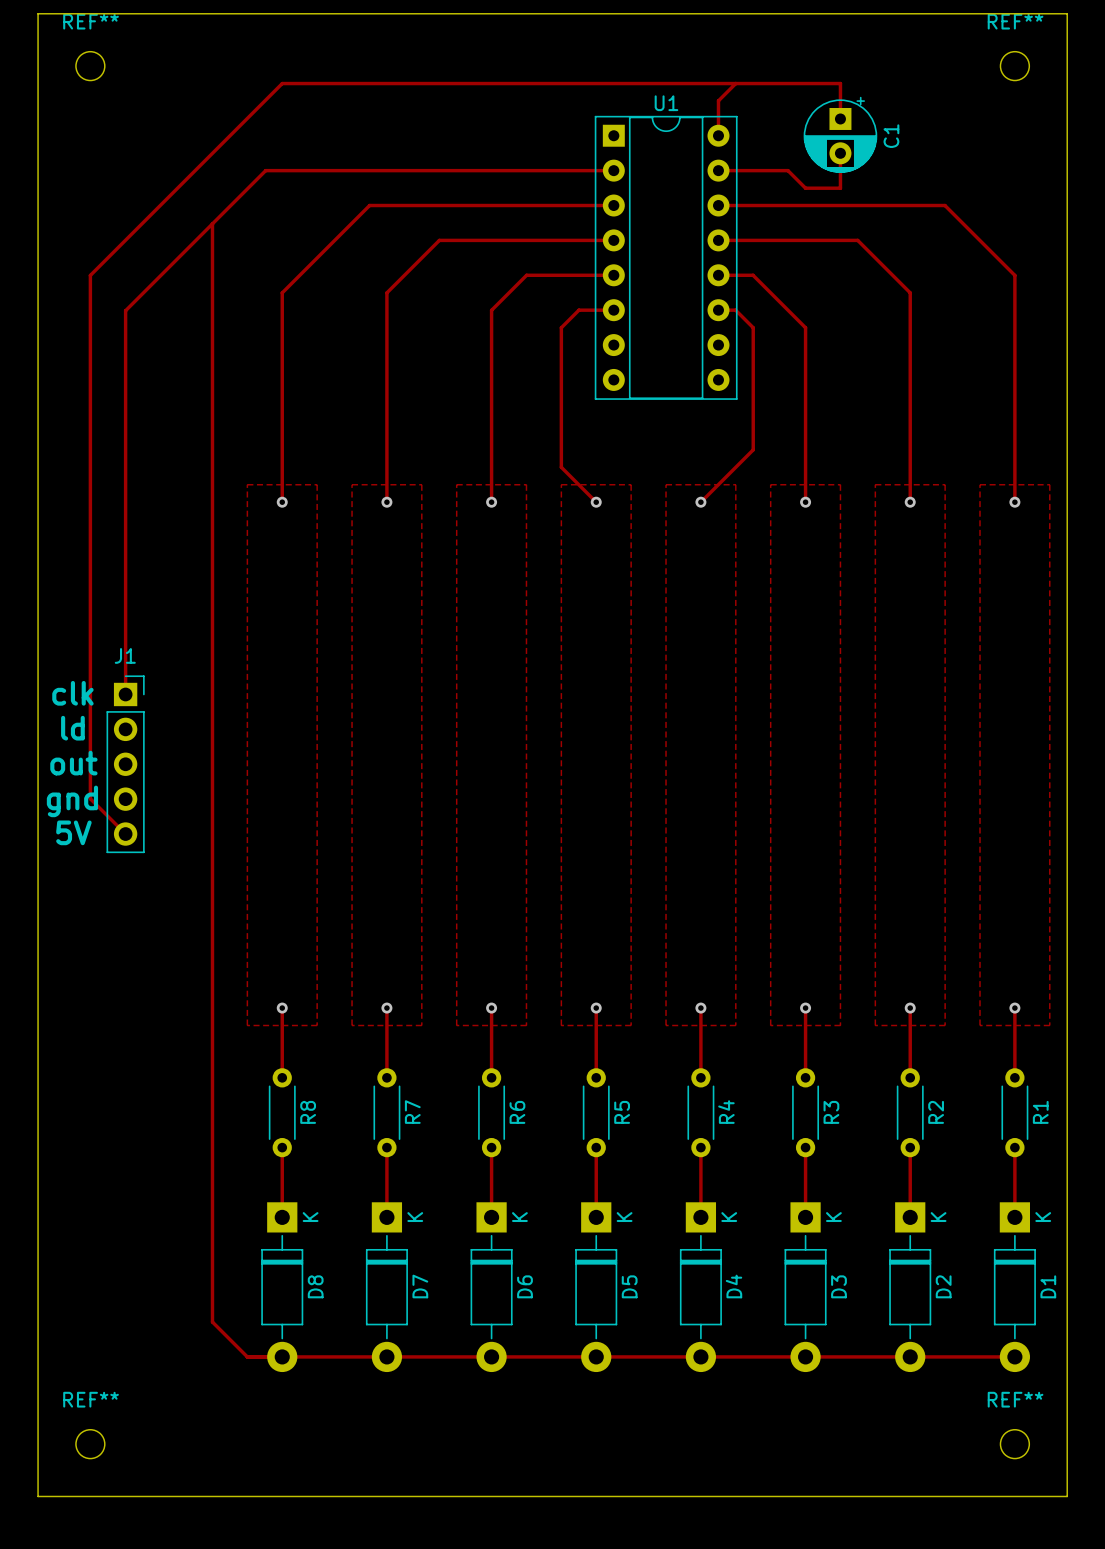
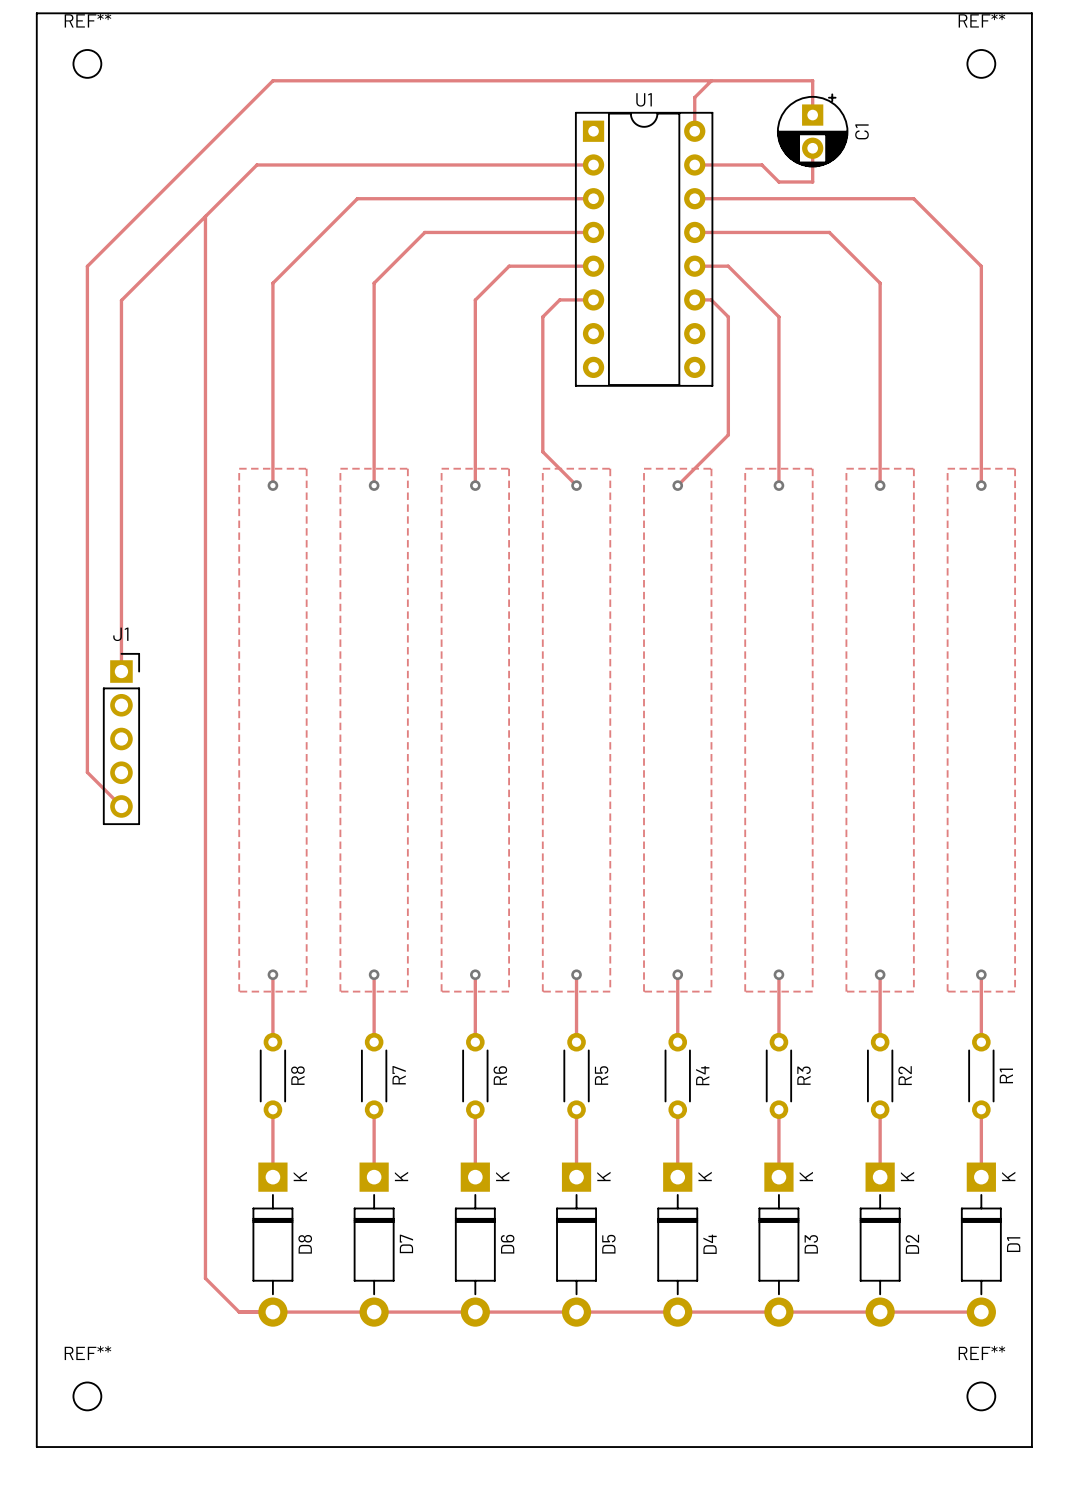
text: clk (72, 693) -> none
text: ld (72, 728) -> none
text: out (73, 763) -> none
text: gnd (72, 801) -> none
text: 5V (73, 832) -> none

